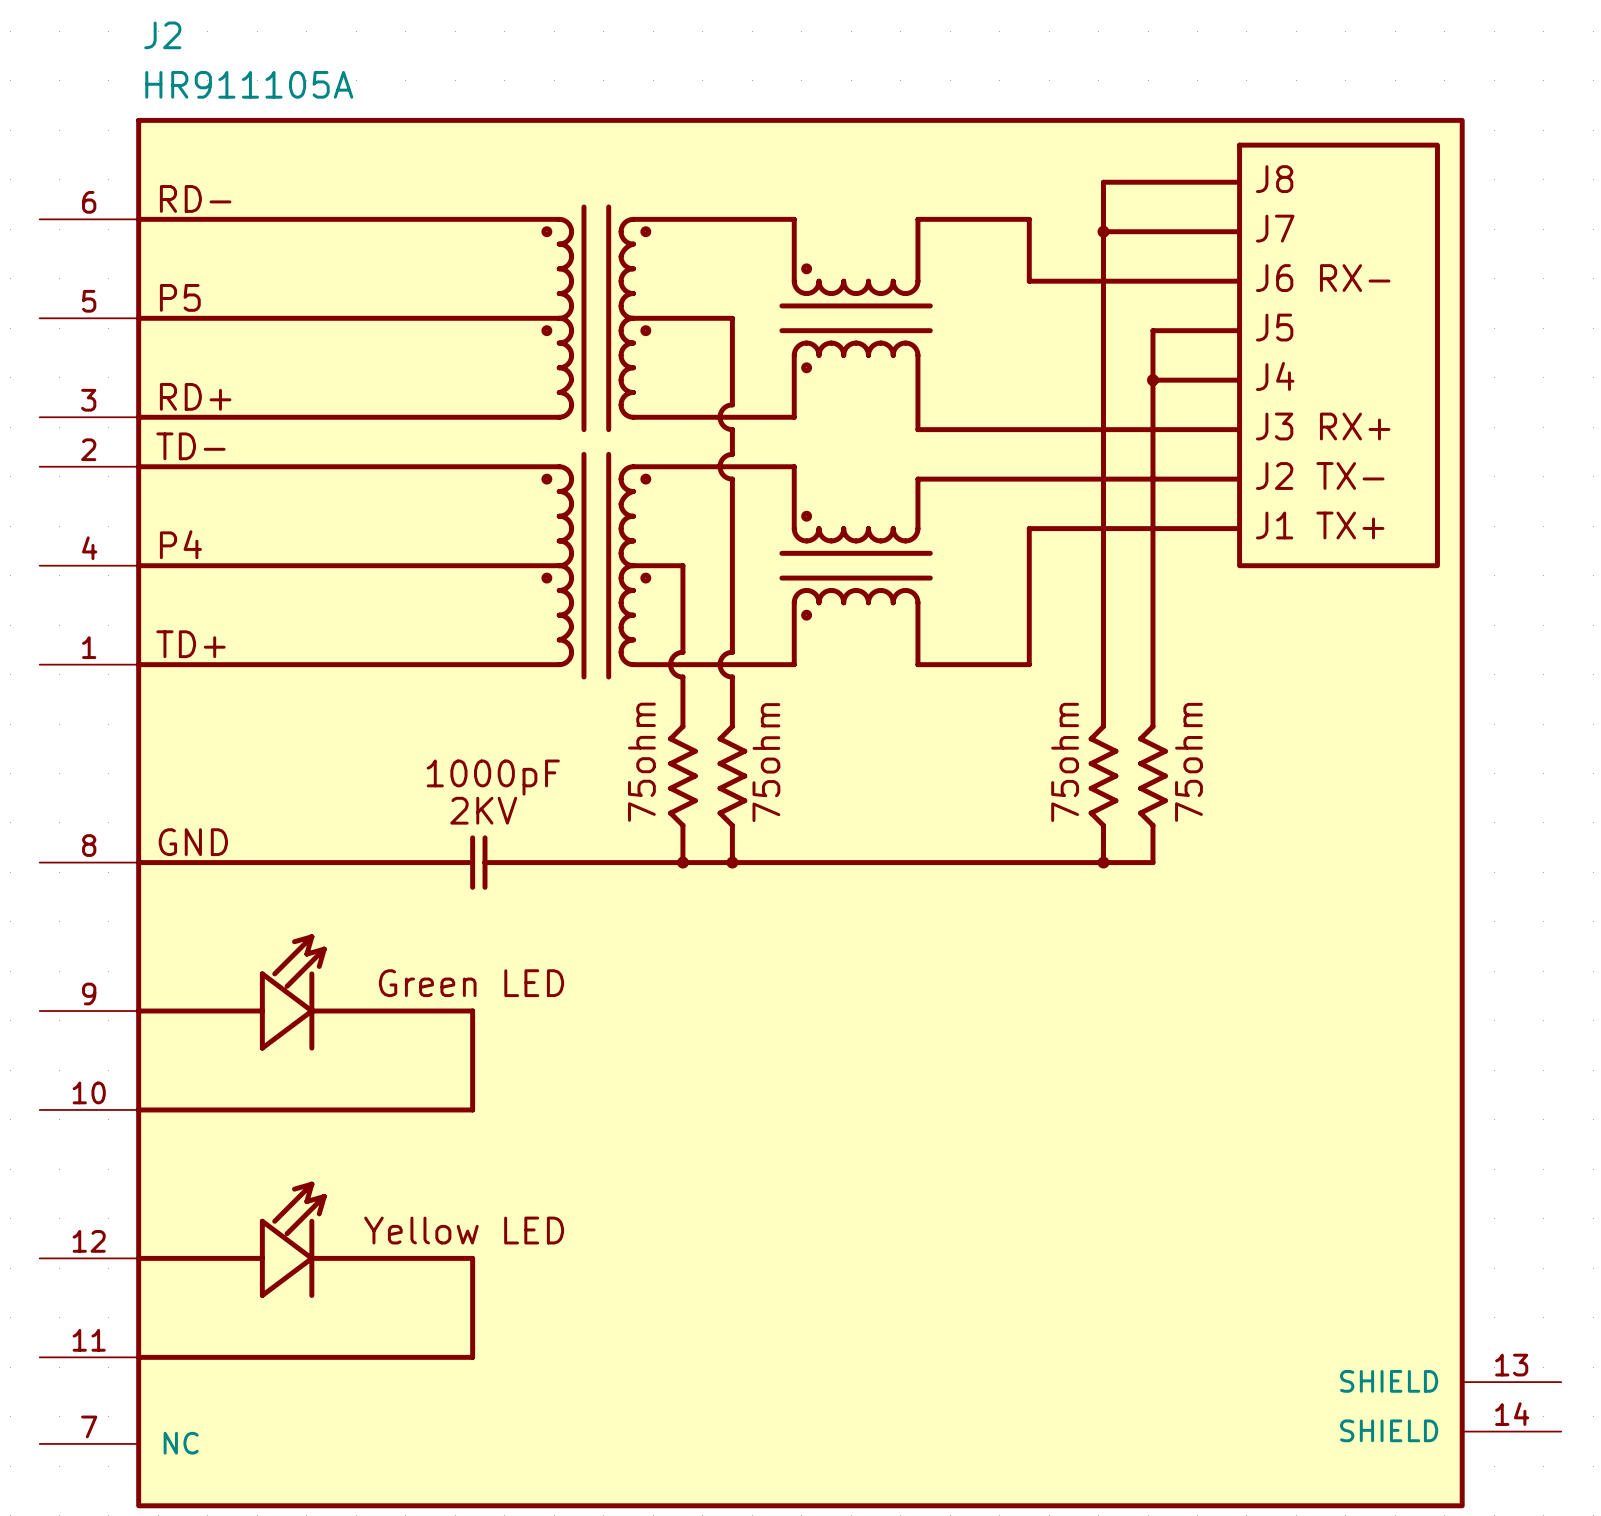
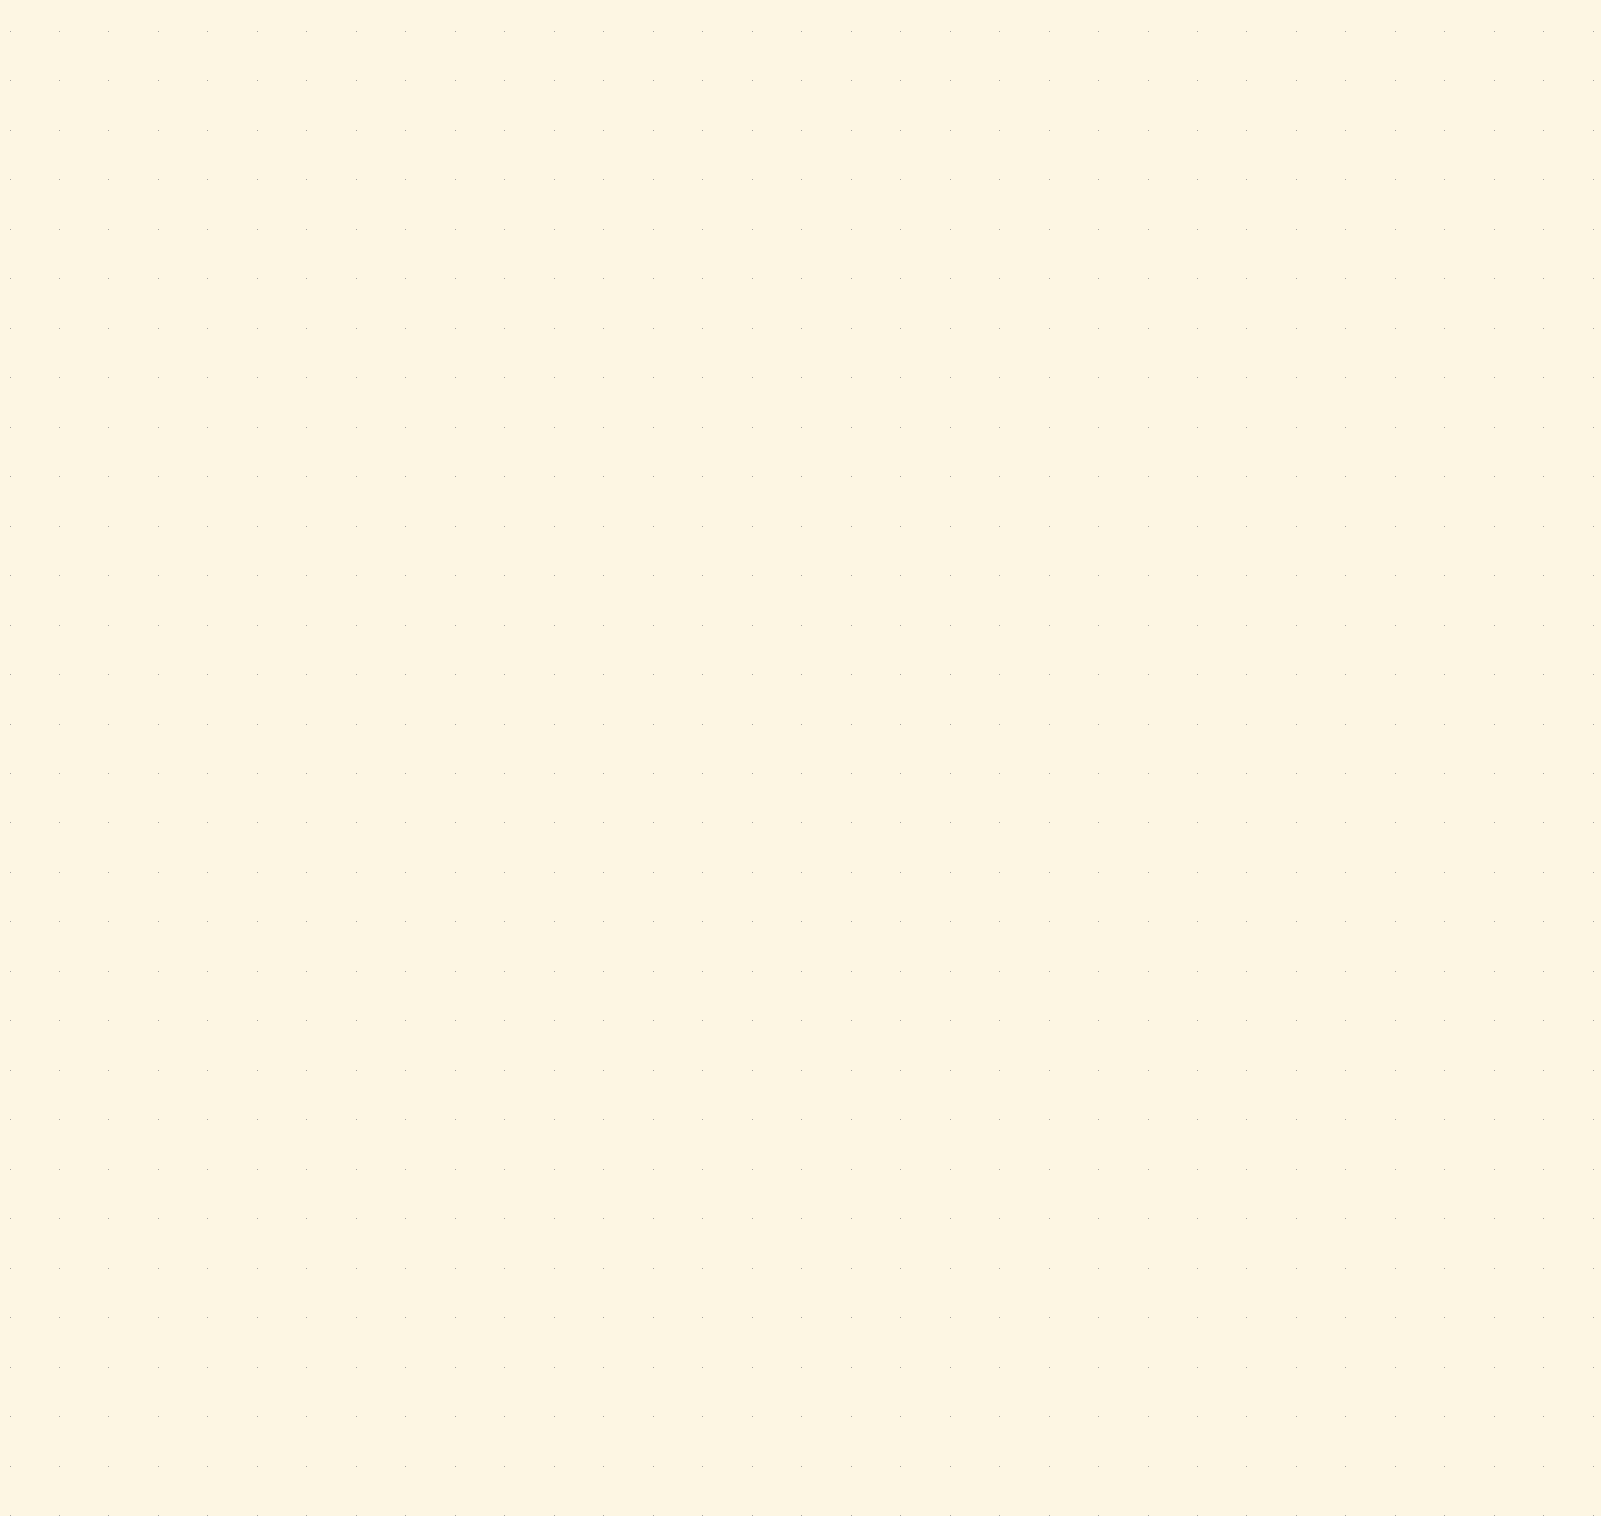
J2: HR911105A (800, 813) -> none

